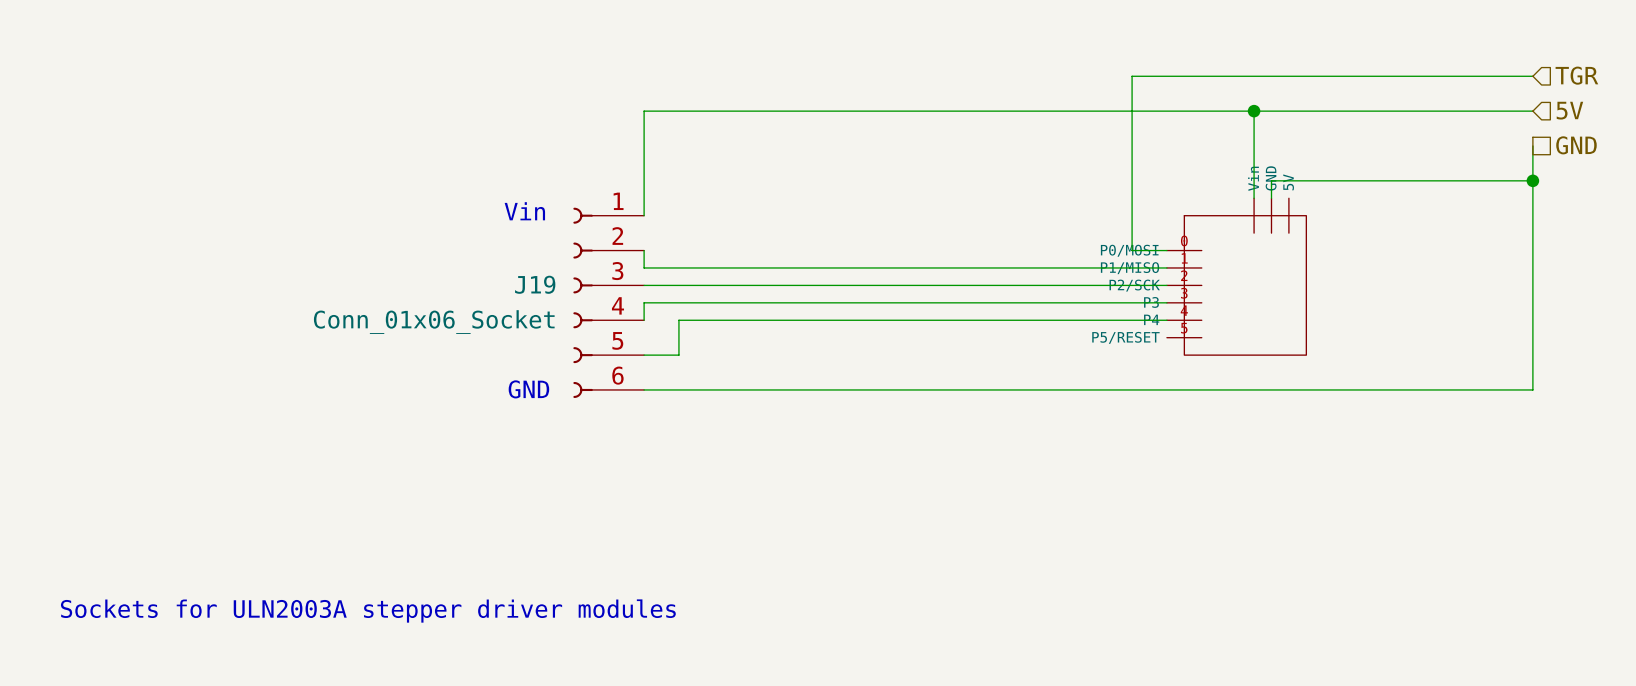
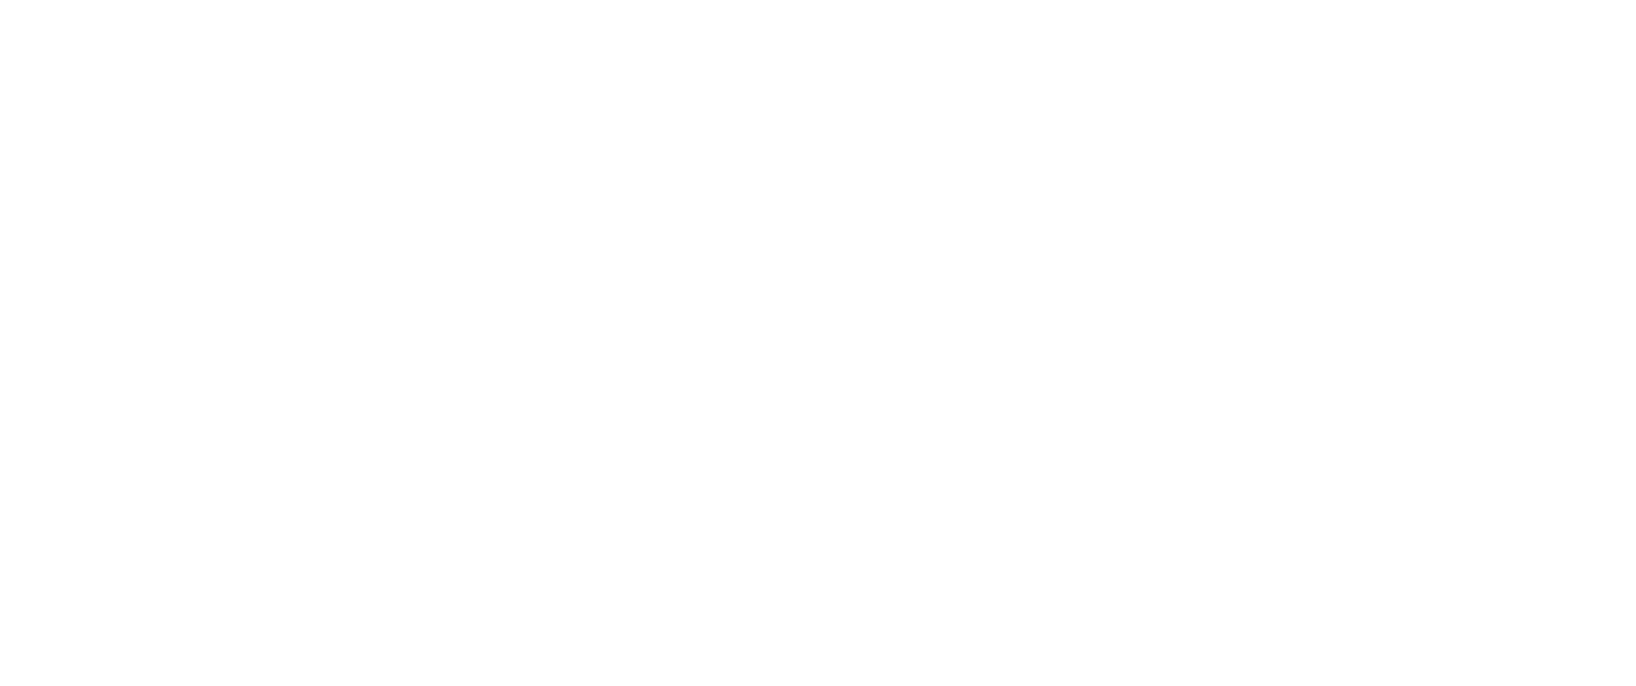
hierarchical label: TGR (1576, 75) -> none
wire: (1532, 76) (1132, 76) (1132, 250) (1166, 250) -> none
hierarchical label: 5V (1569, 110) -> none
wire: (1254, 111) (1254, 198) -> none
junction: (1254, 111) -> none
wire: (1532, 111) (644, 111) (644, 215) -> none
wire: (1532, 145) (1532, 389) (644, 389) -> none
hierarchical label: GND (1576, 145) -> none
wire: (1532, 180) (1271, 180) (1271, 198) -> none
junction: (1532, 180) -> none
text: Vin (524, 211) -> none
wire: (644, 250) (644, 267) (1166, 267) -> none
part: (1236, 276) -> none
wire: (644, 285) (1166, 285) -> none
J19: Conn_01x06_Socket (608, 302) -> none
wire: (1166, 302) (644, 302) (644, 320) -> none
wire: (1166, 320) (678, 320) (678, 355) (644, 355) -> none
text: GND (528, 389) -> none
text: Sockets for ULN2003A stepper driver modules (368, 611) -> none

